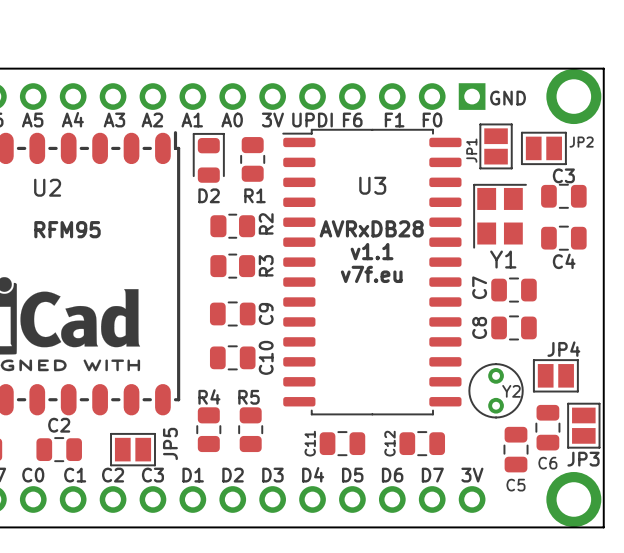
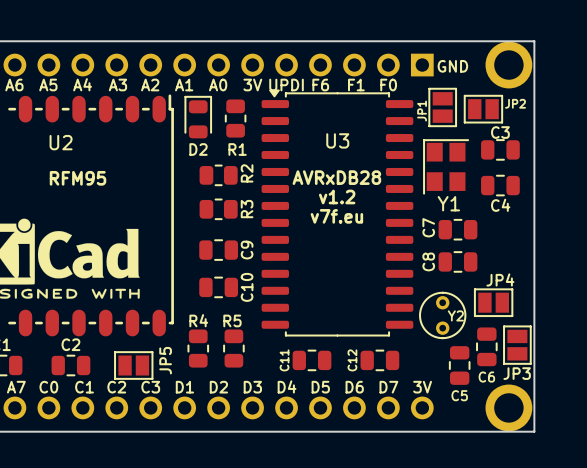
U3 footprint: [282, 128, 462, 416] -> [261, 89, 414, 337]
text: v1.1 (372, 251) -> v1.2 (337, 196)

